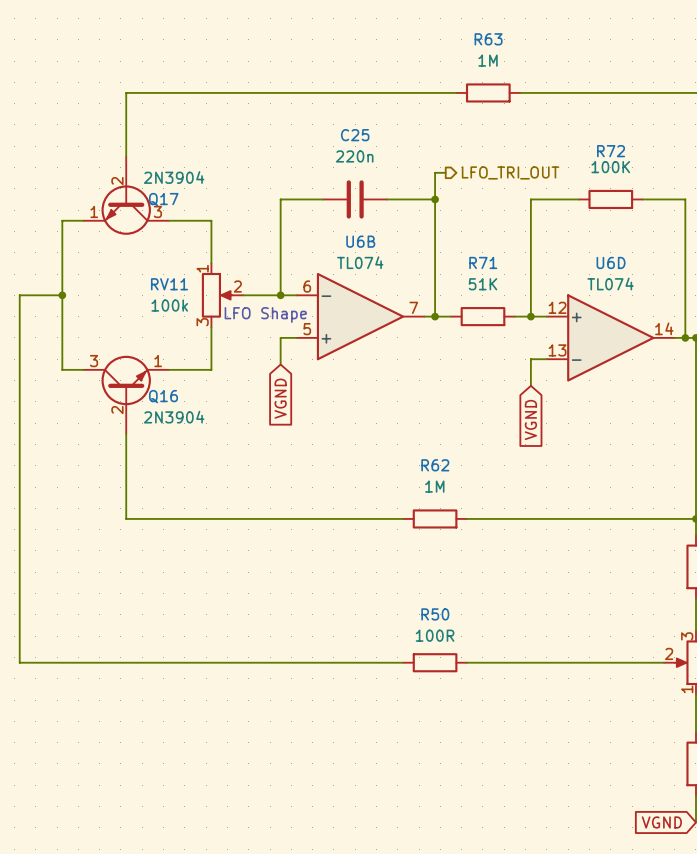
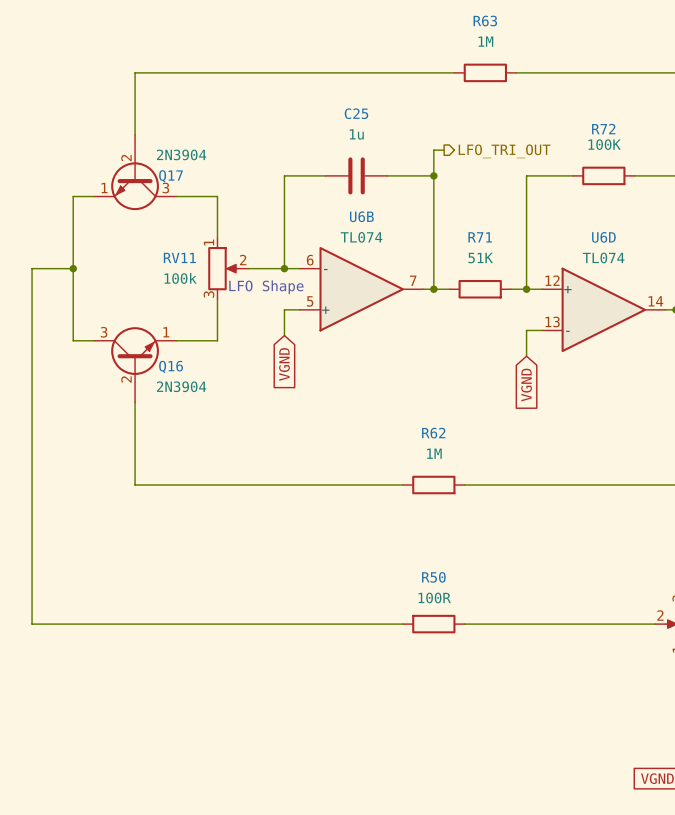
C25 value: 220n (354, 156) -> 1u (356, 134)

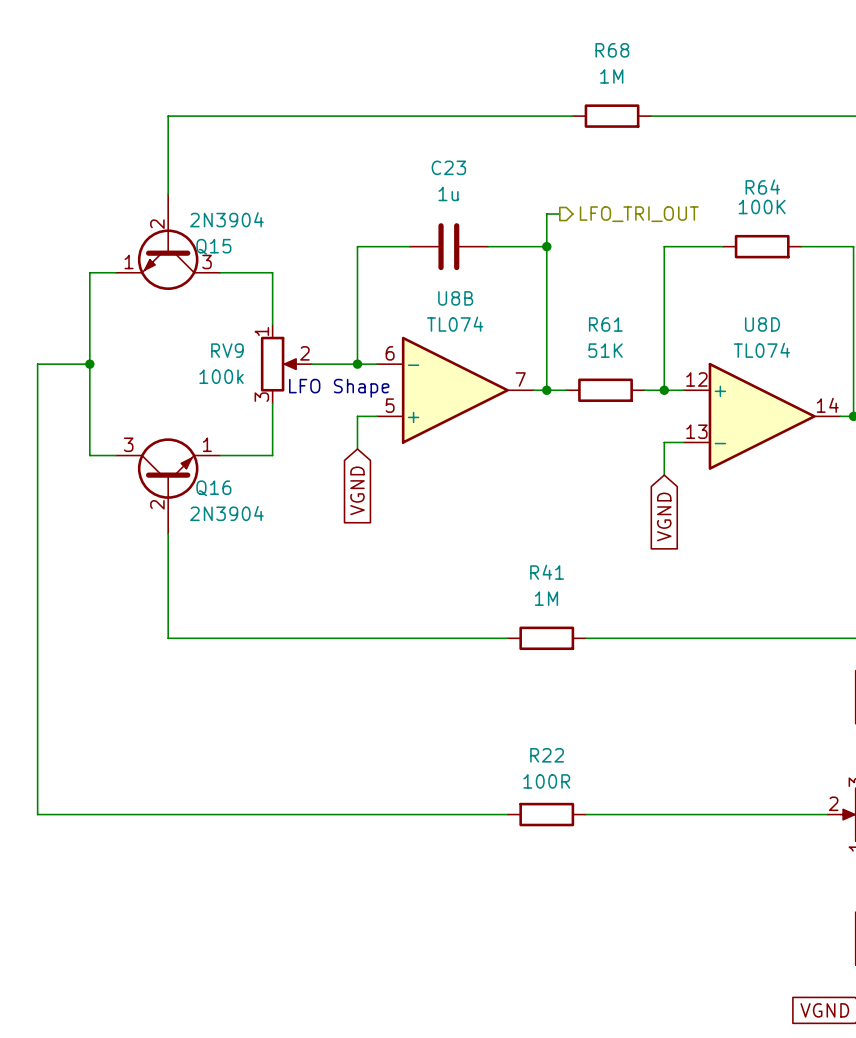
R63 name: R63 (485, 21) -> R68 (612, 50)
C25 name: C25 (356, 113) -> C23 (448, 167)
R72 name: R72 (603, 129) -> R64 (762, 187)
Q17 name: Q17 (170, 176) -> Q15 (213, 246)
U6B name: U6B (361, 216) -> U8B (455, 298)
R71 name: R71 (480, 237) -> R61 (605, 324)
U6D name: U6D (603, 237) -> U8D (762, 324)
RV11 name: RV11 (179, 257) -> RV9 (227, 350)
R62 name: R62 (433, 433) -> R41 (547, 572)
R50 name: R50 (433, 577) -> R22 (547, 755)

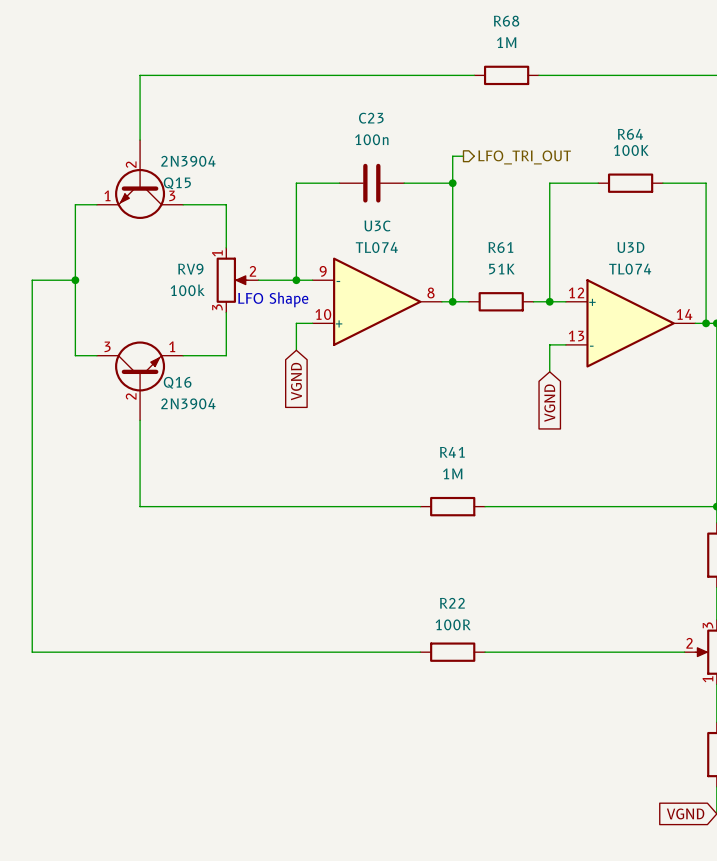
C23 value: 1u (448, 193) -> 100n (371, 139)
U8B name: U8B (455, 298) -> U3C (377, 225)
U8D name: U8D (762, 324) -> U3D (630, 247)
U8B pin number: 6 (390, 353) -> 9 (323, 271)
U8B pin number: 7 (520, 379) -> 8 (431, 292)
U8B pin number: 5 (390, 405) -> 10 (323, 314)

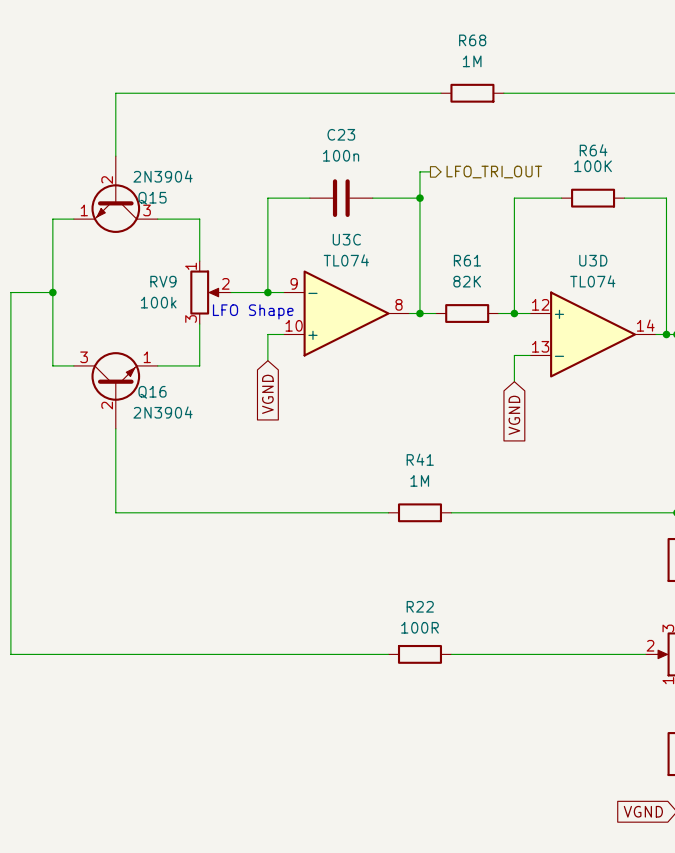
R61 value: 51K (501, 269) -> 82K (467, 281)

